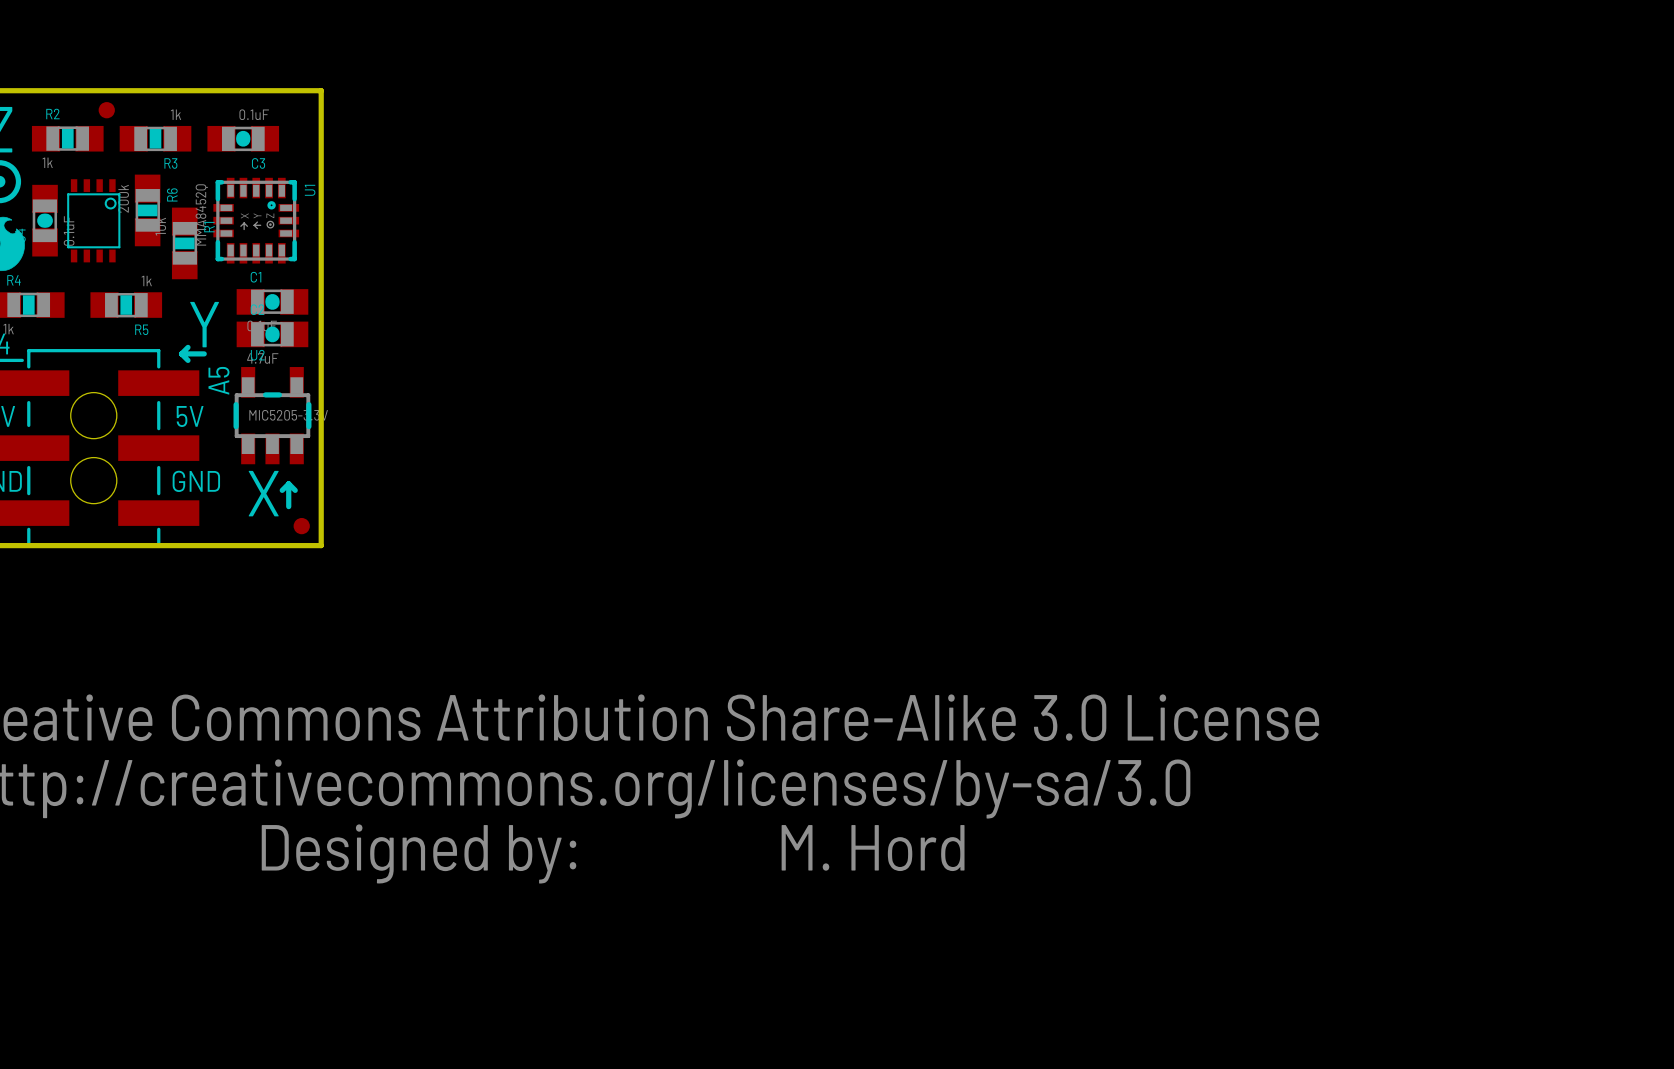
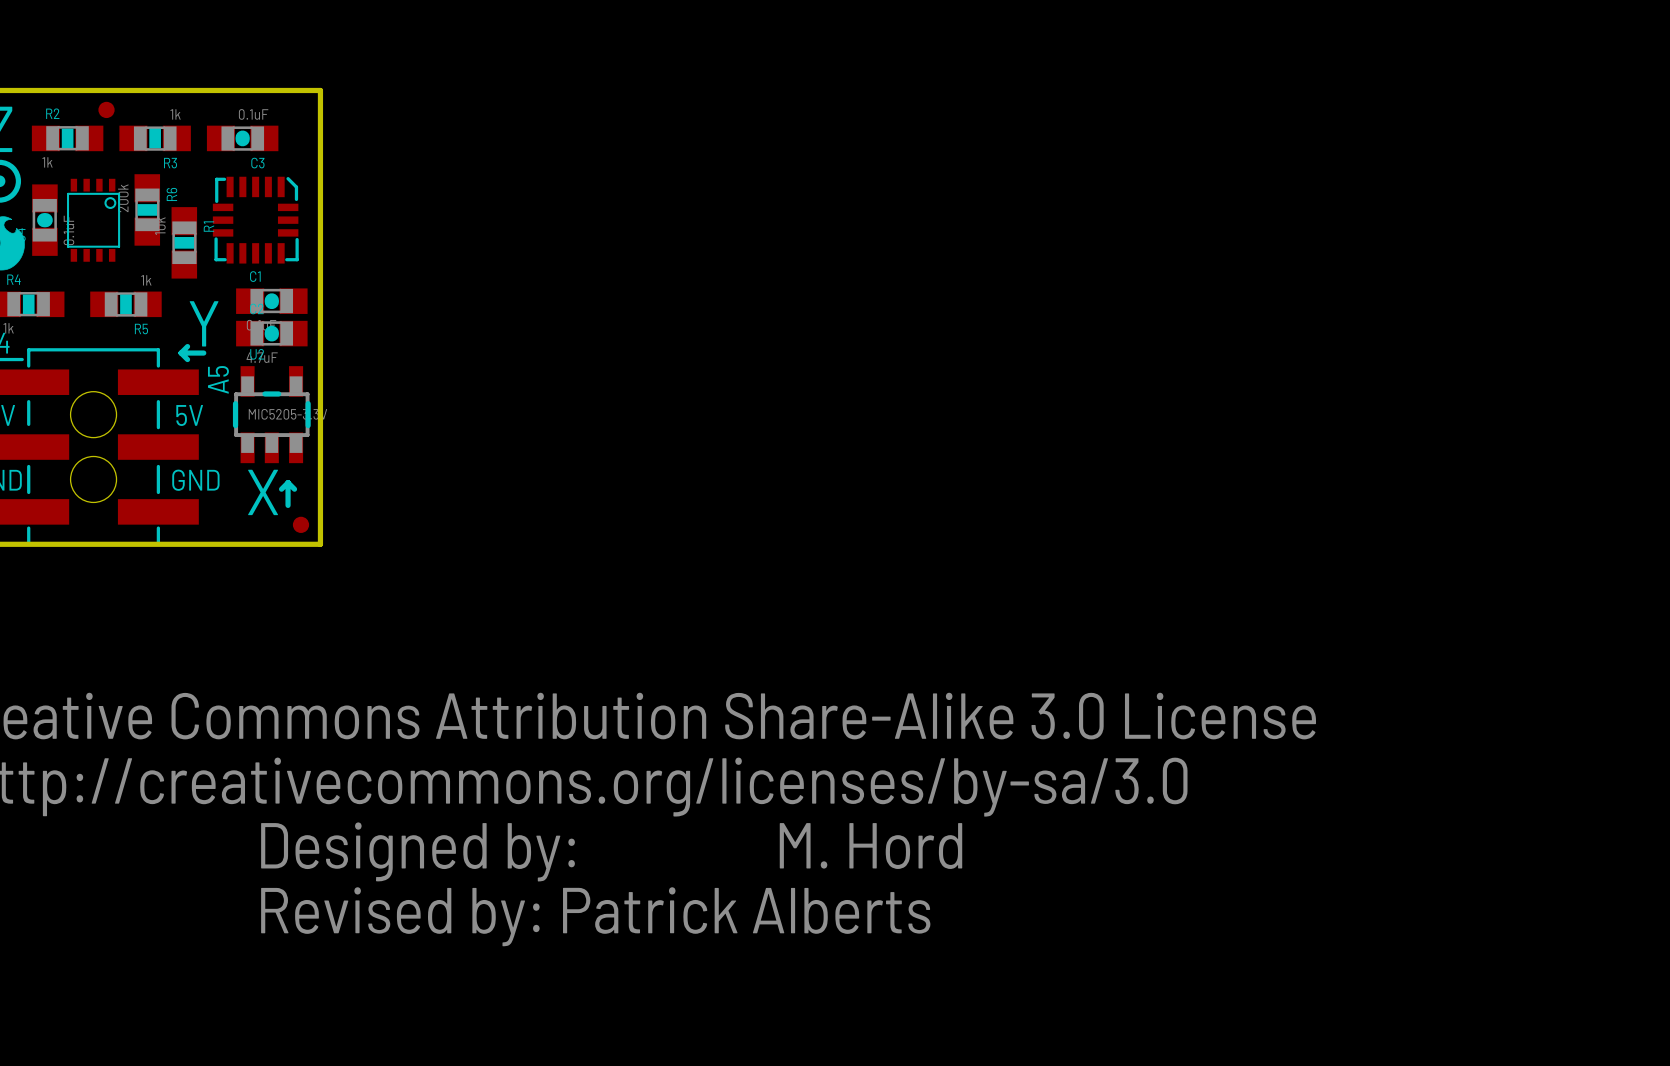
U1: MMA8452Q (256, 220) -> none
part: none -> (255, 220)
text: none -> Revised by: Patrick Alberts (595, 916)

